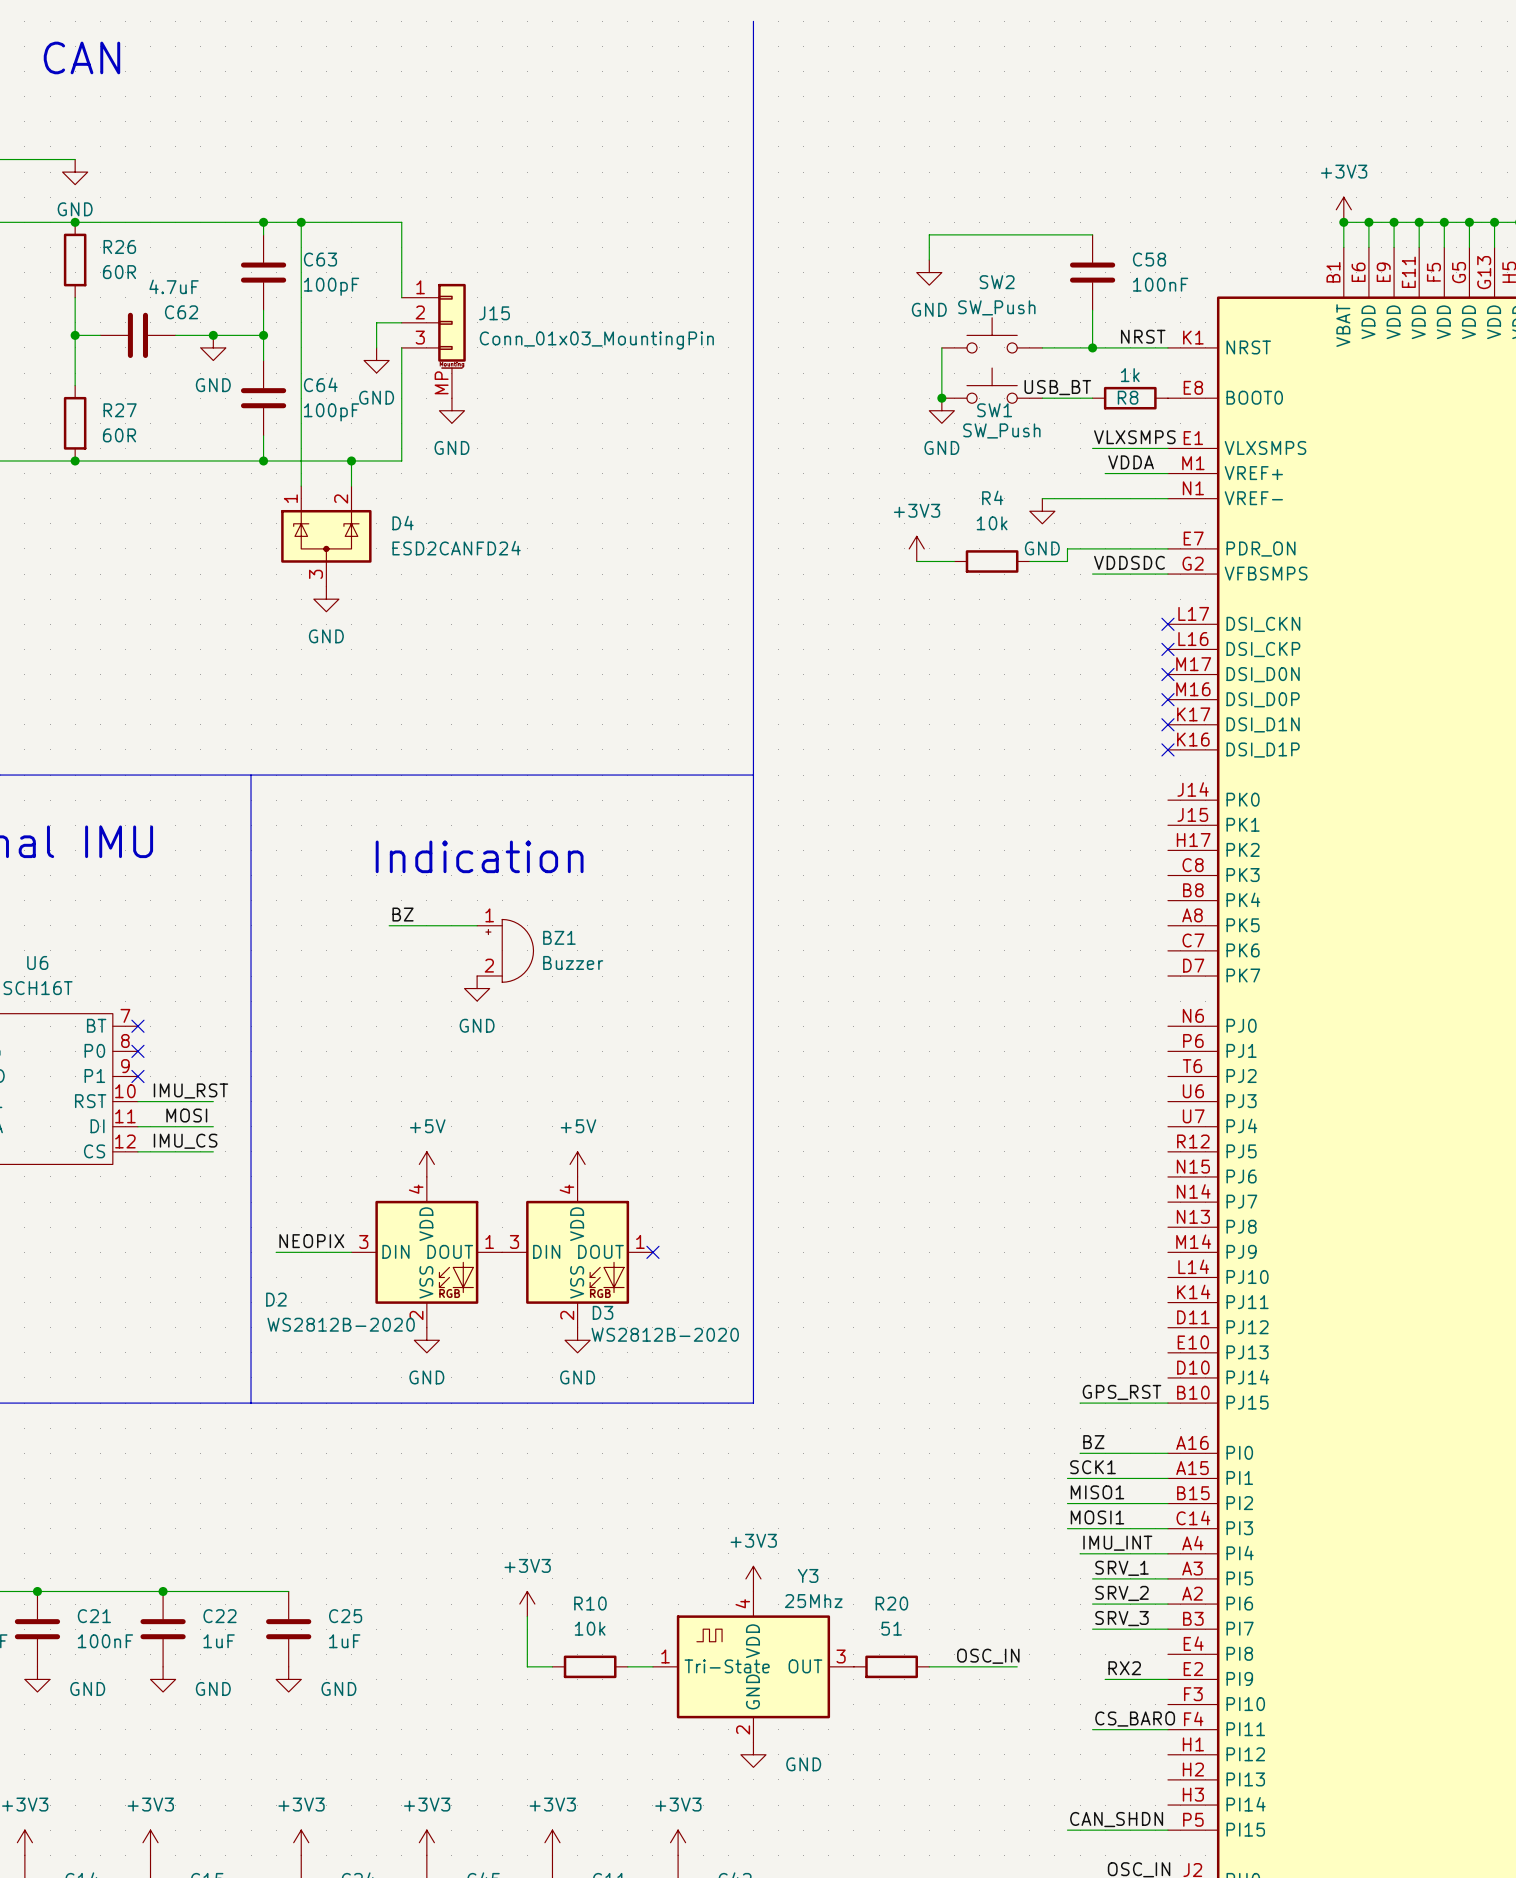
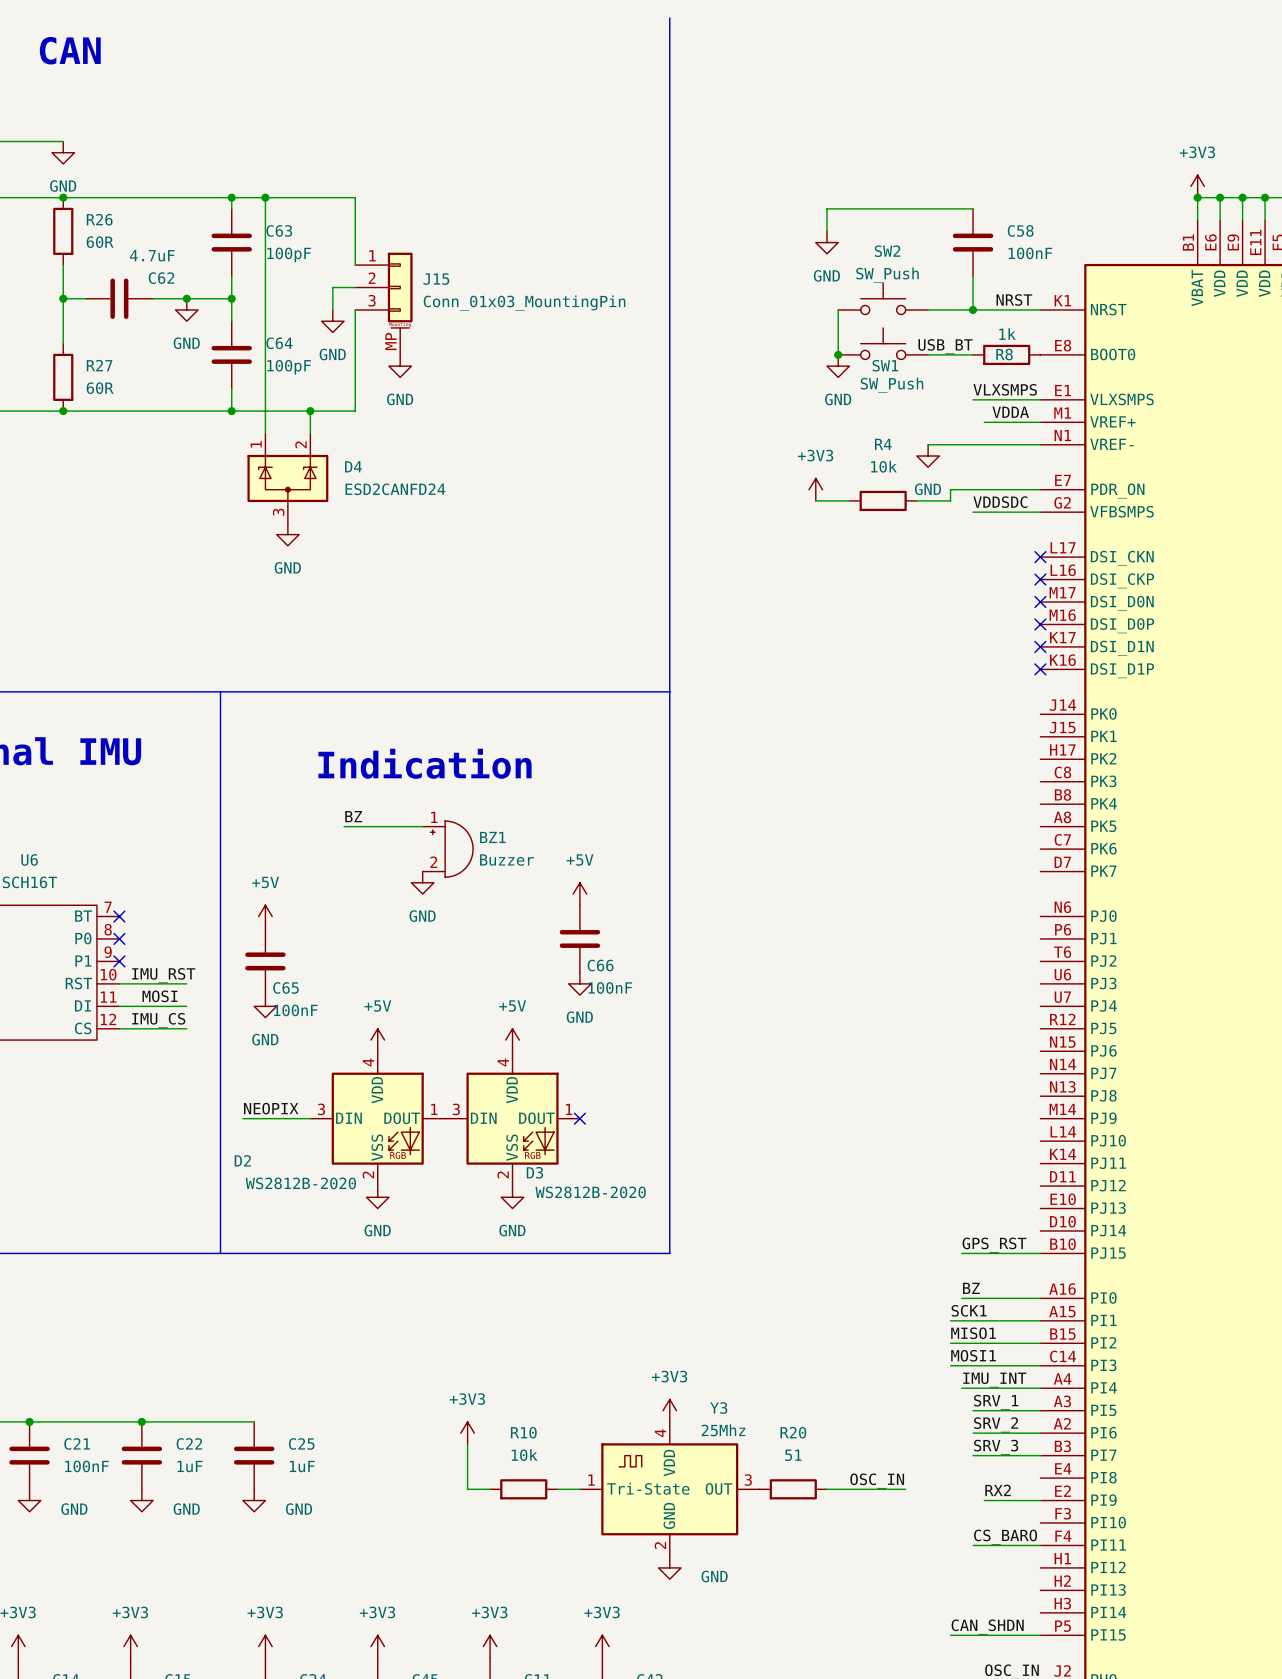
power symbol: none -> +5V (579, 894)
power symbol: none -> +5V (265, 916)
C66: none -> 100nF (579, 938)
C65: none -> 100nF (265, 961)
power symbol: none -> GND (579, 983)
power symbol: none -> GND (265, 1006)

